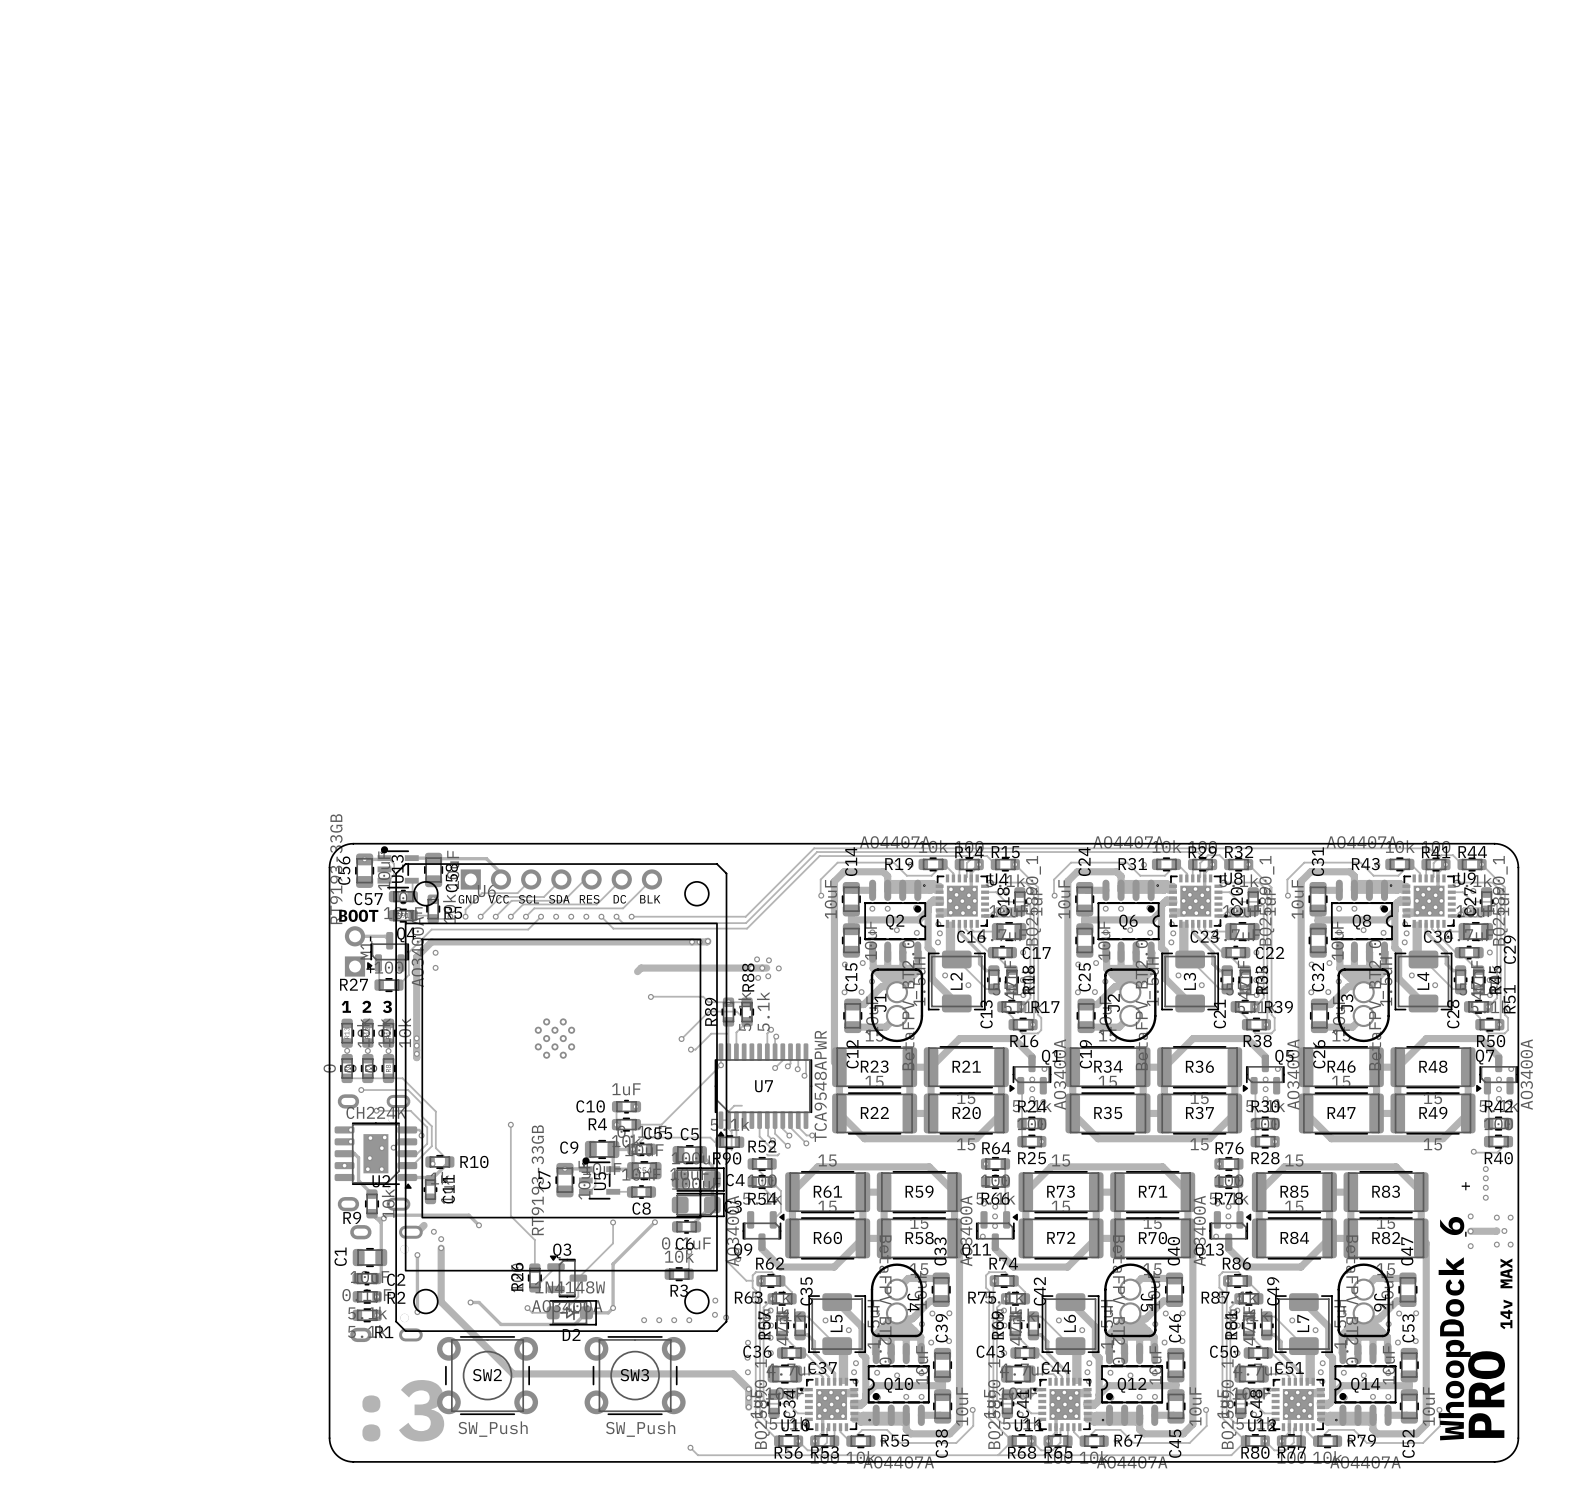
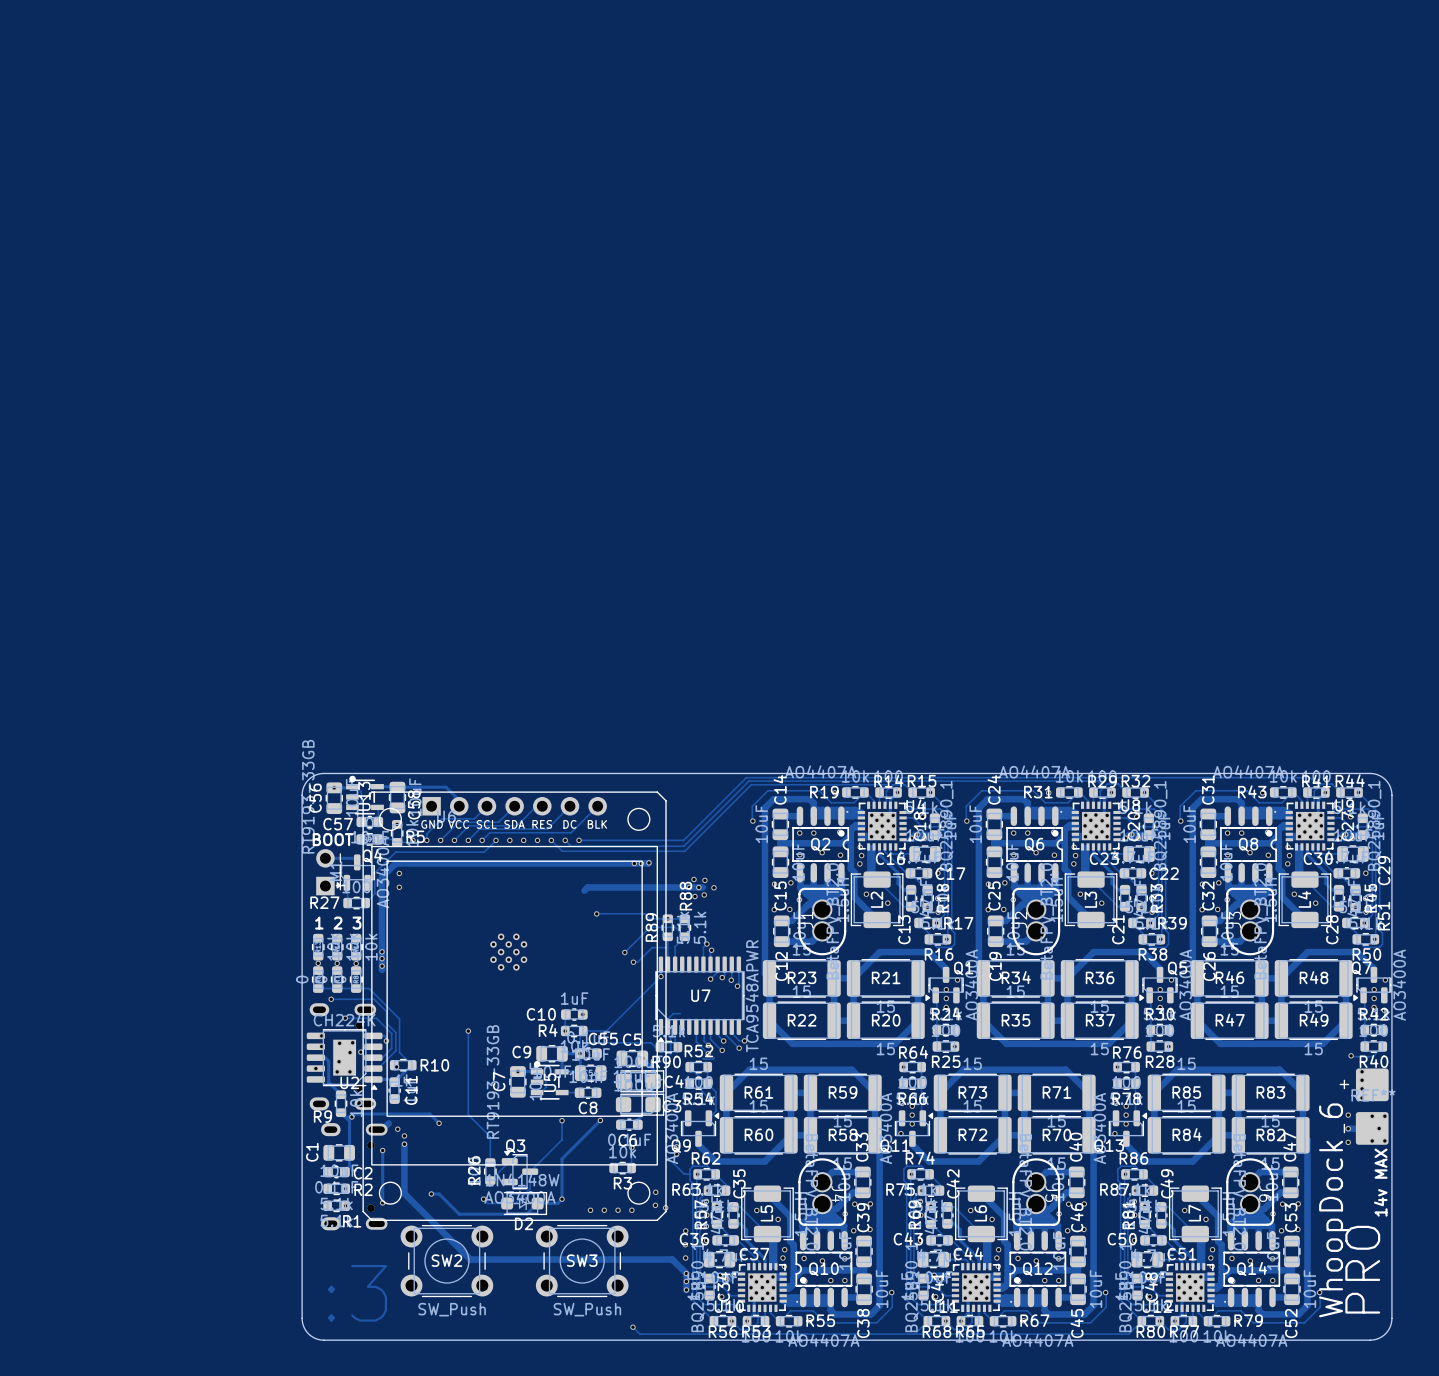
part: none -> (1372, 1084)
part: none -> (1372, 1128)

